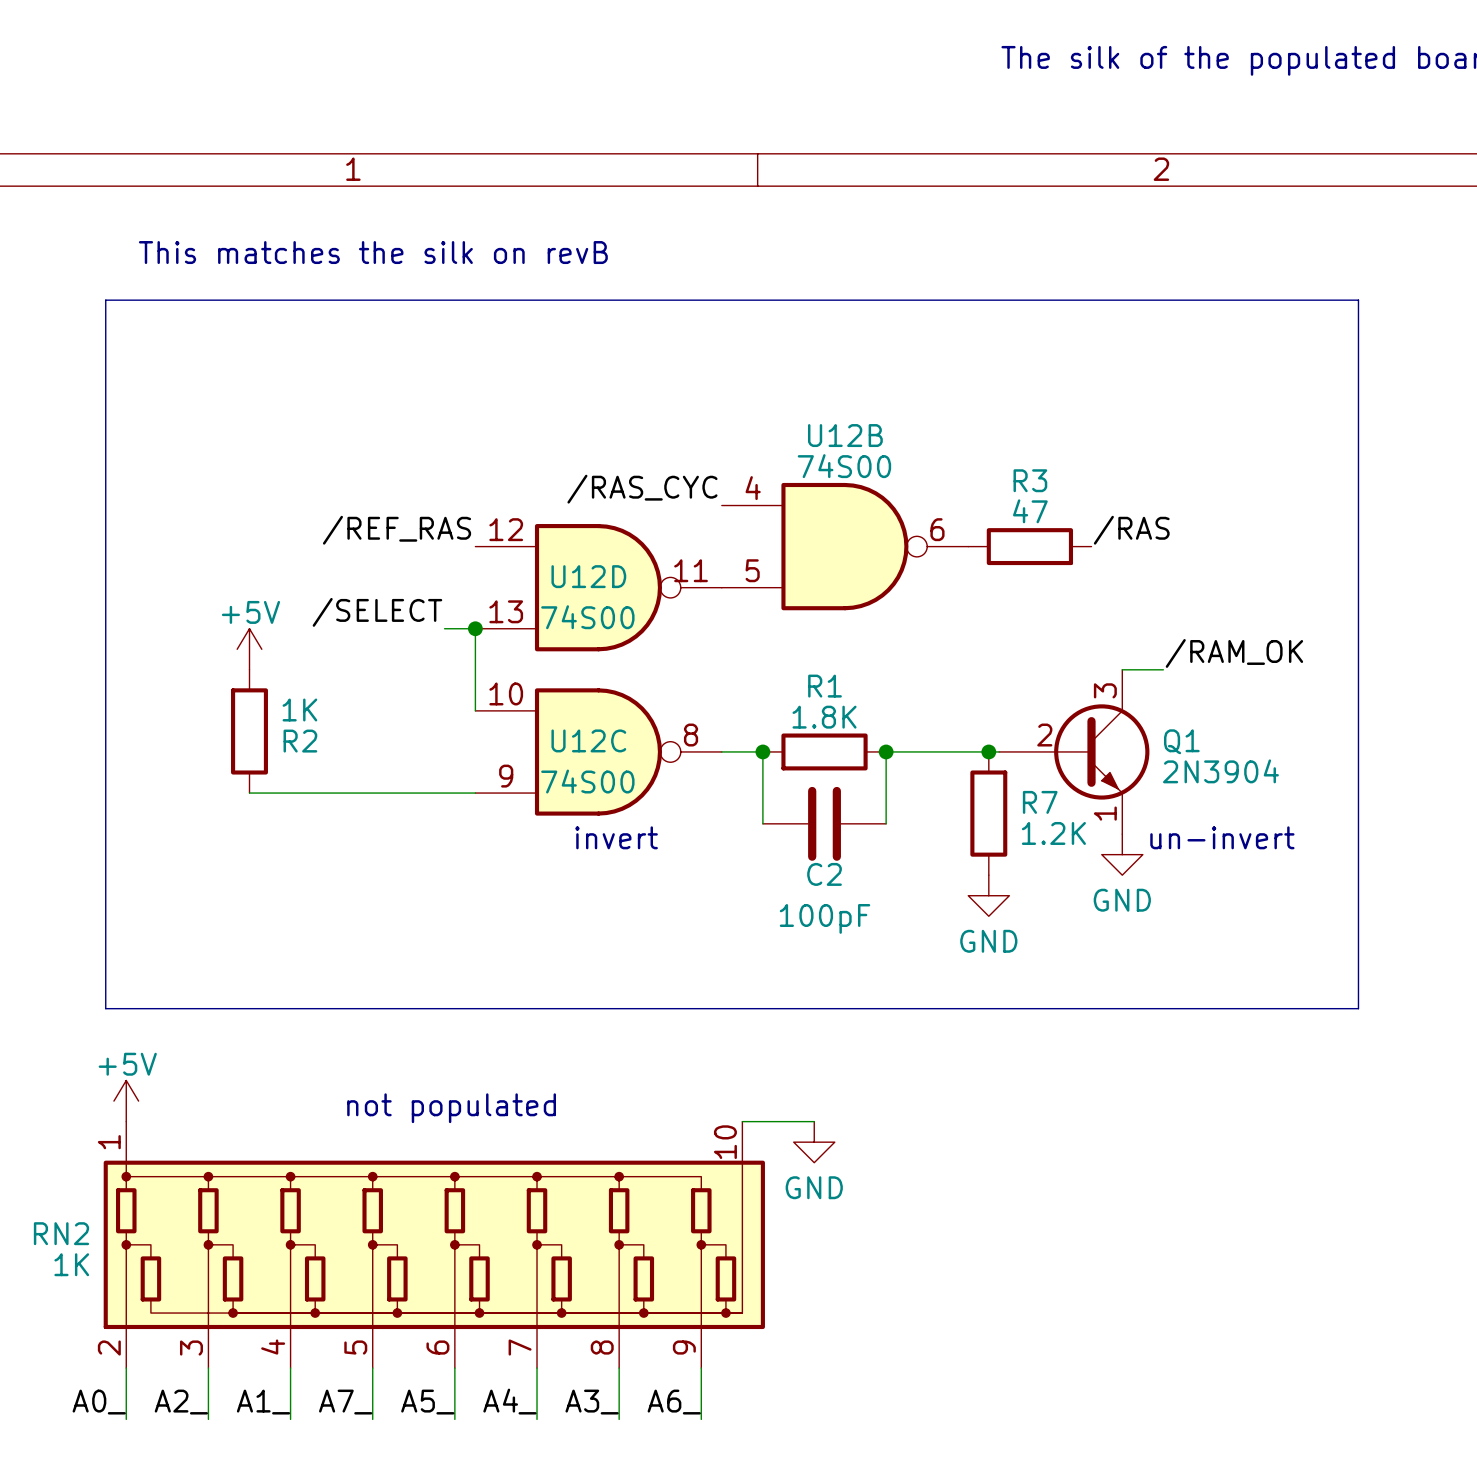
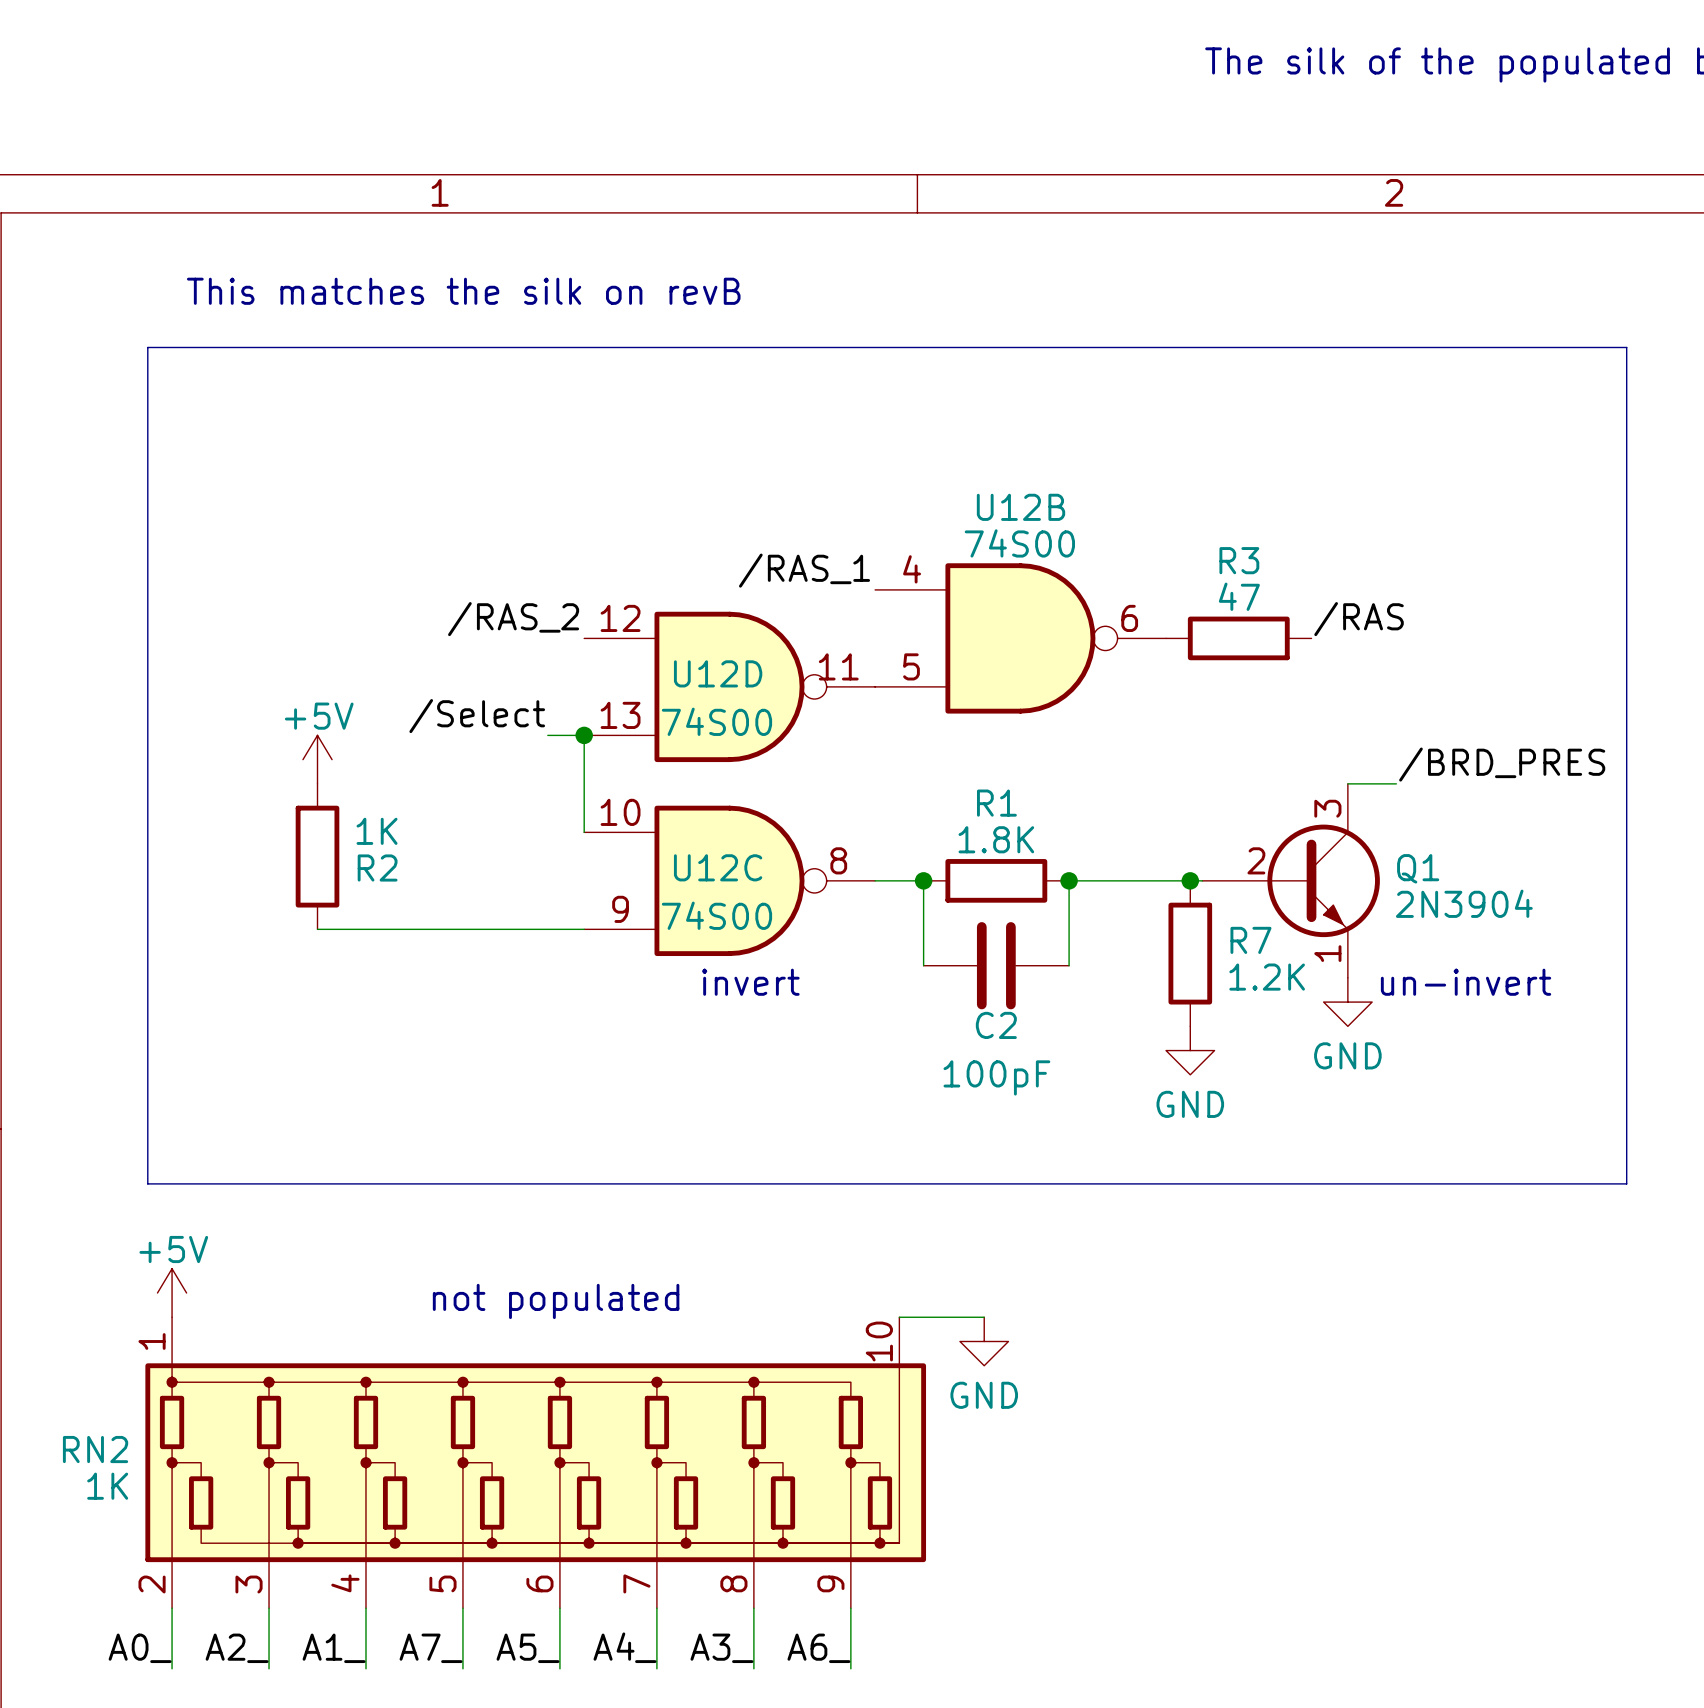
label: /RAS_CYC (642, 489) -> /RAS_1 (804, 570)
label: /REF_RAS (397, 530) -> /RAS_2 (513, 619)
label: /SELECT (377, 612) -> /Select (477, 716)
label: /RAM_OK (1234, 653) -> /BRD_PRES (1502, 764)

